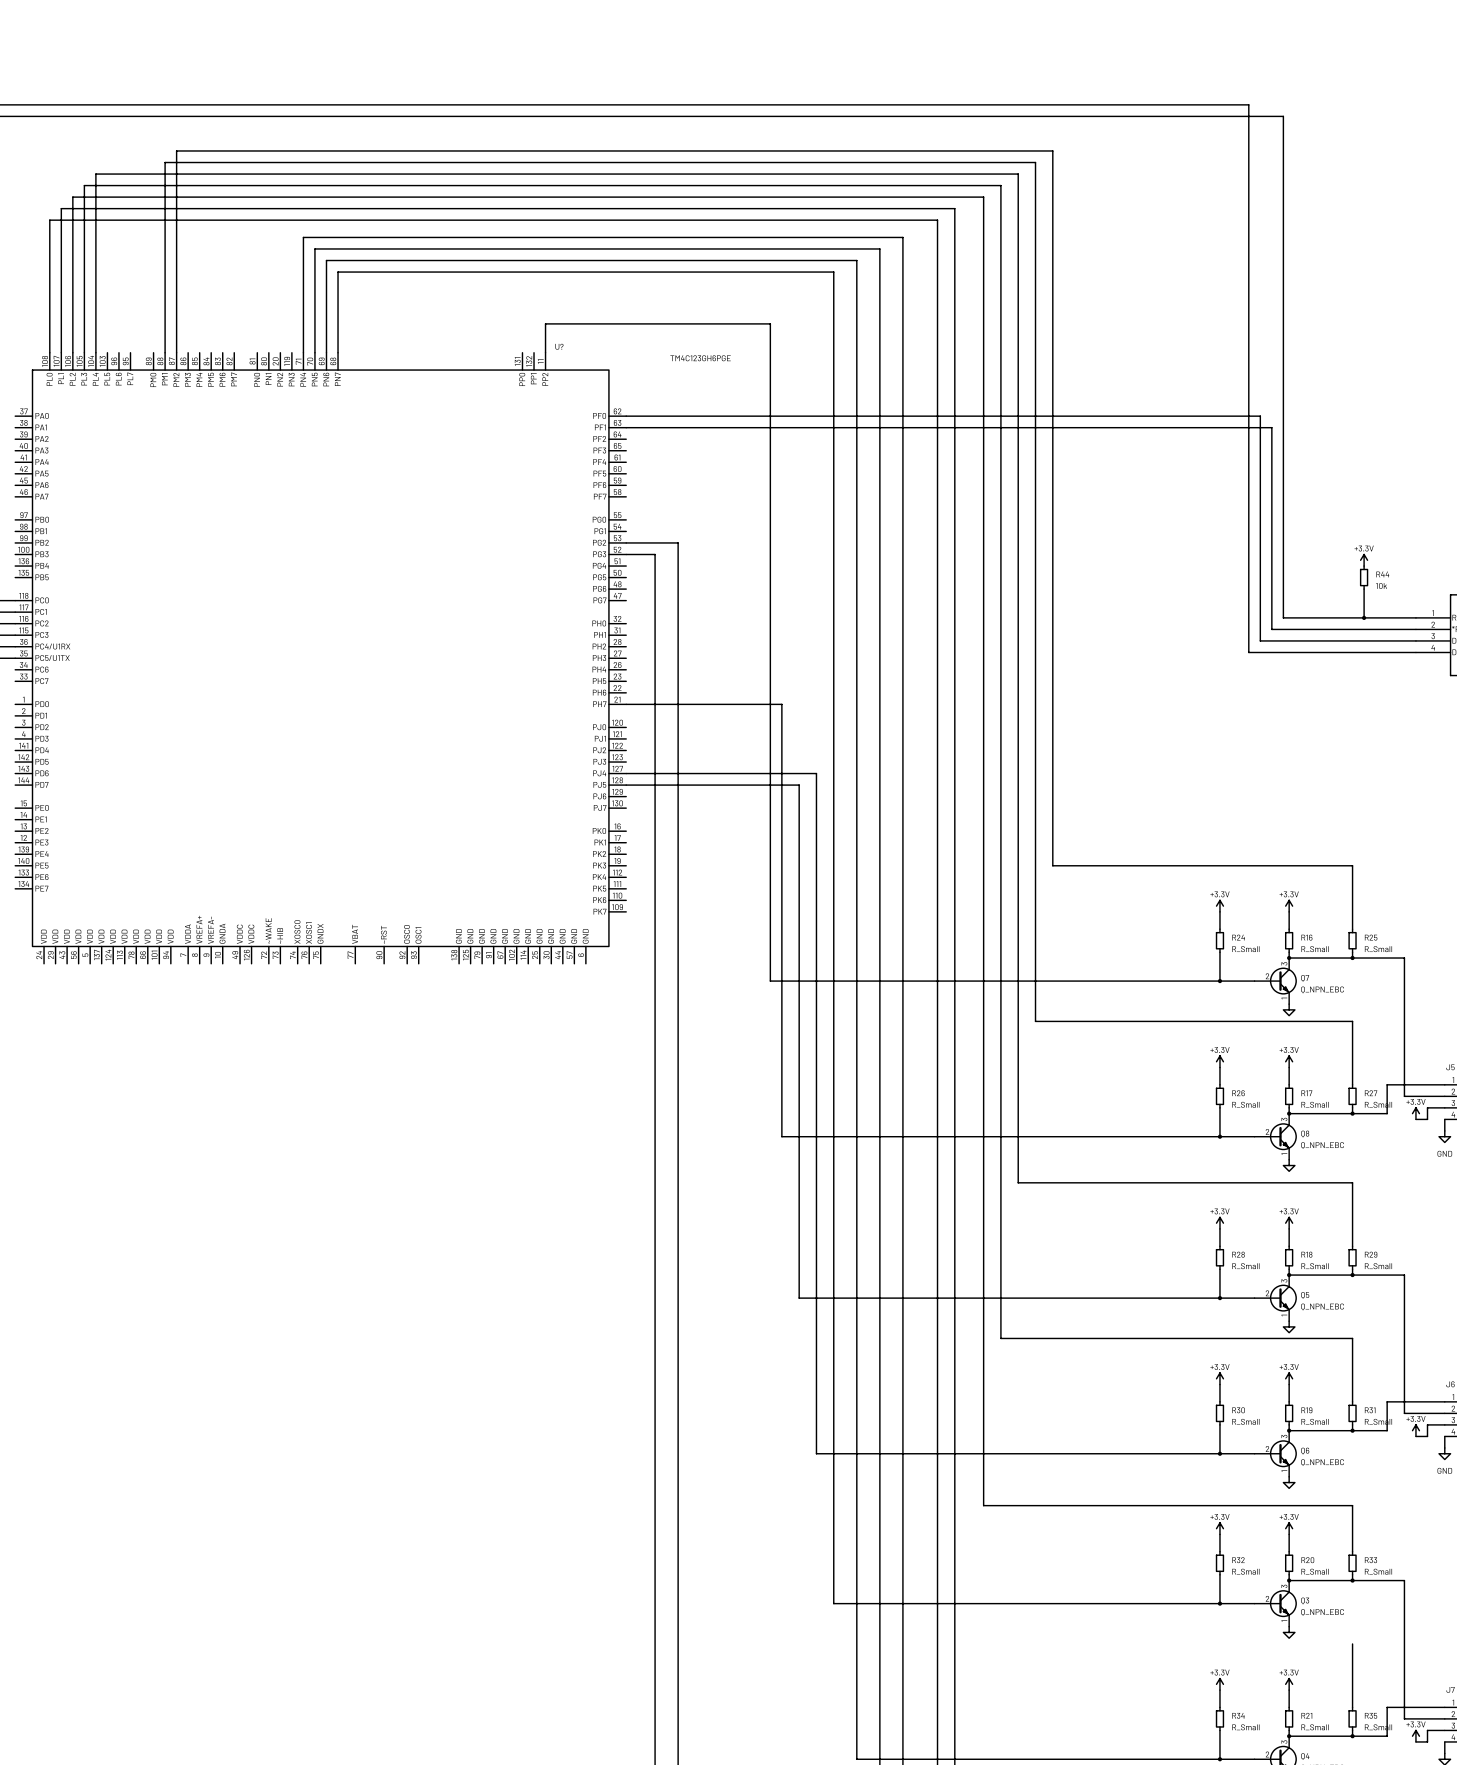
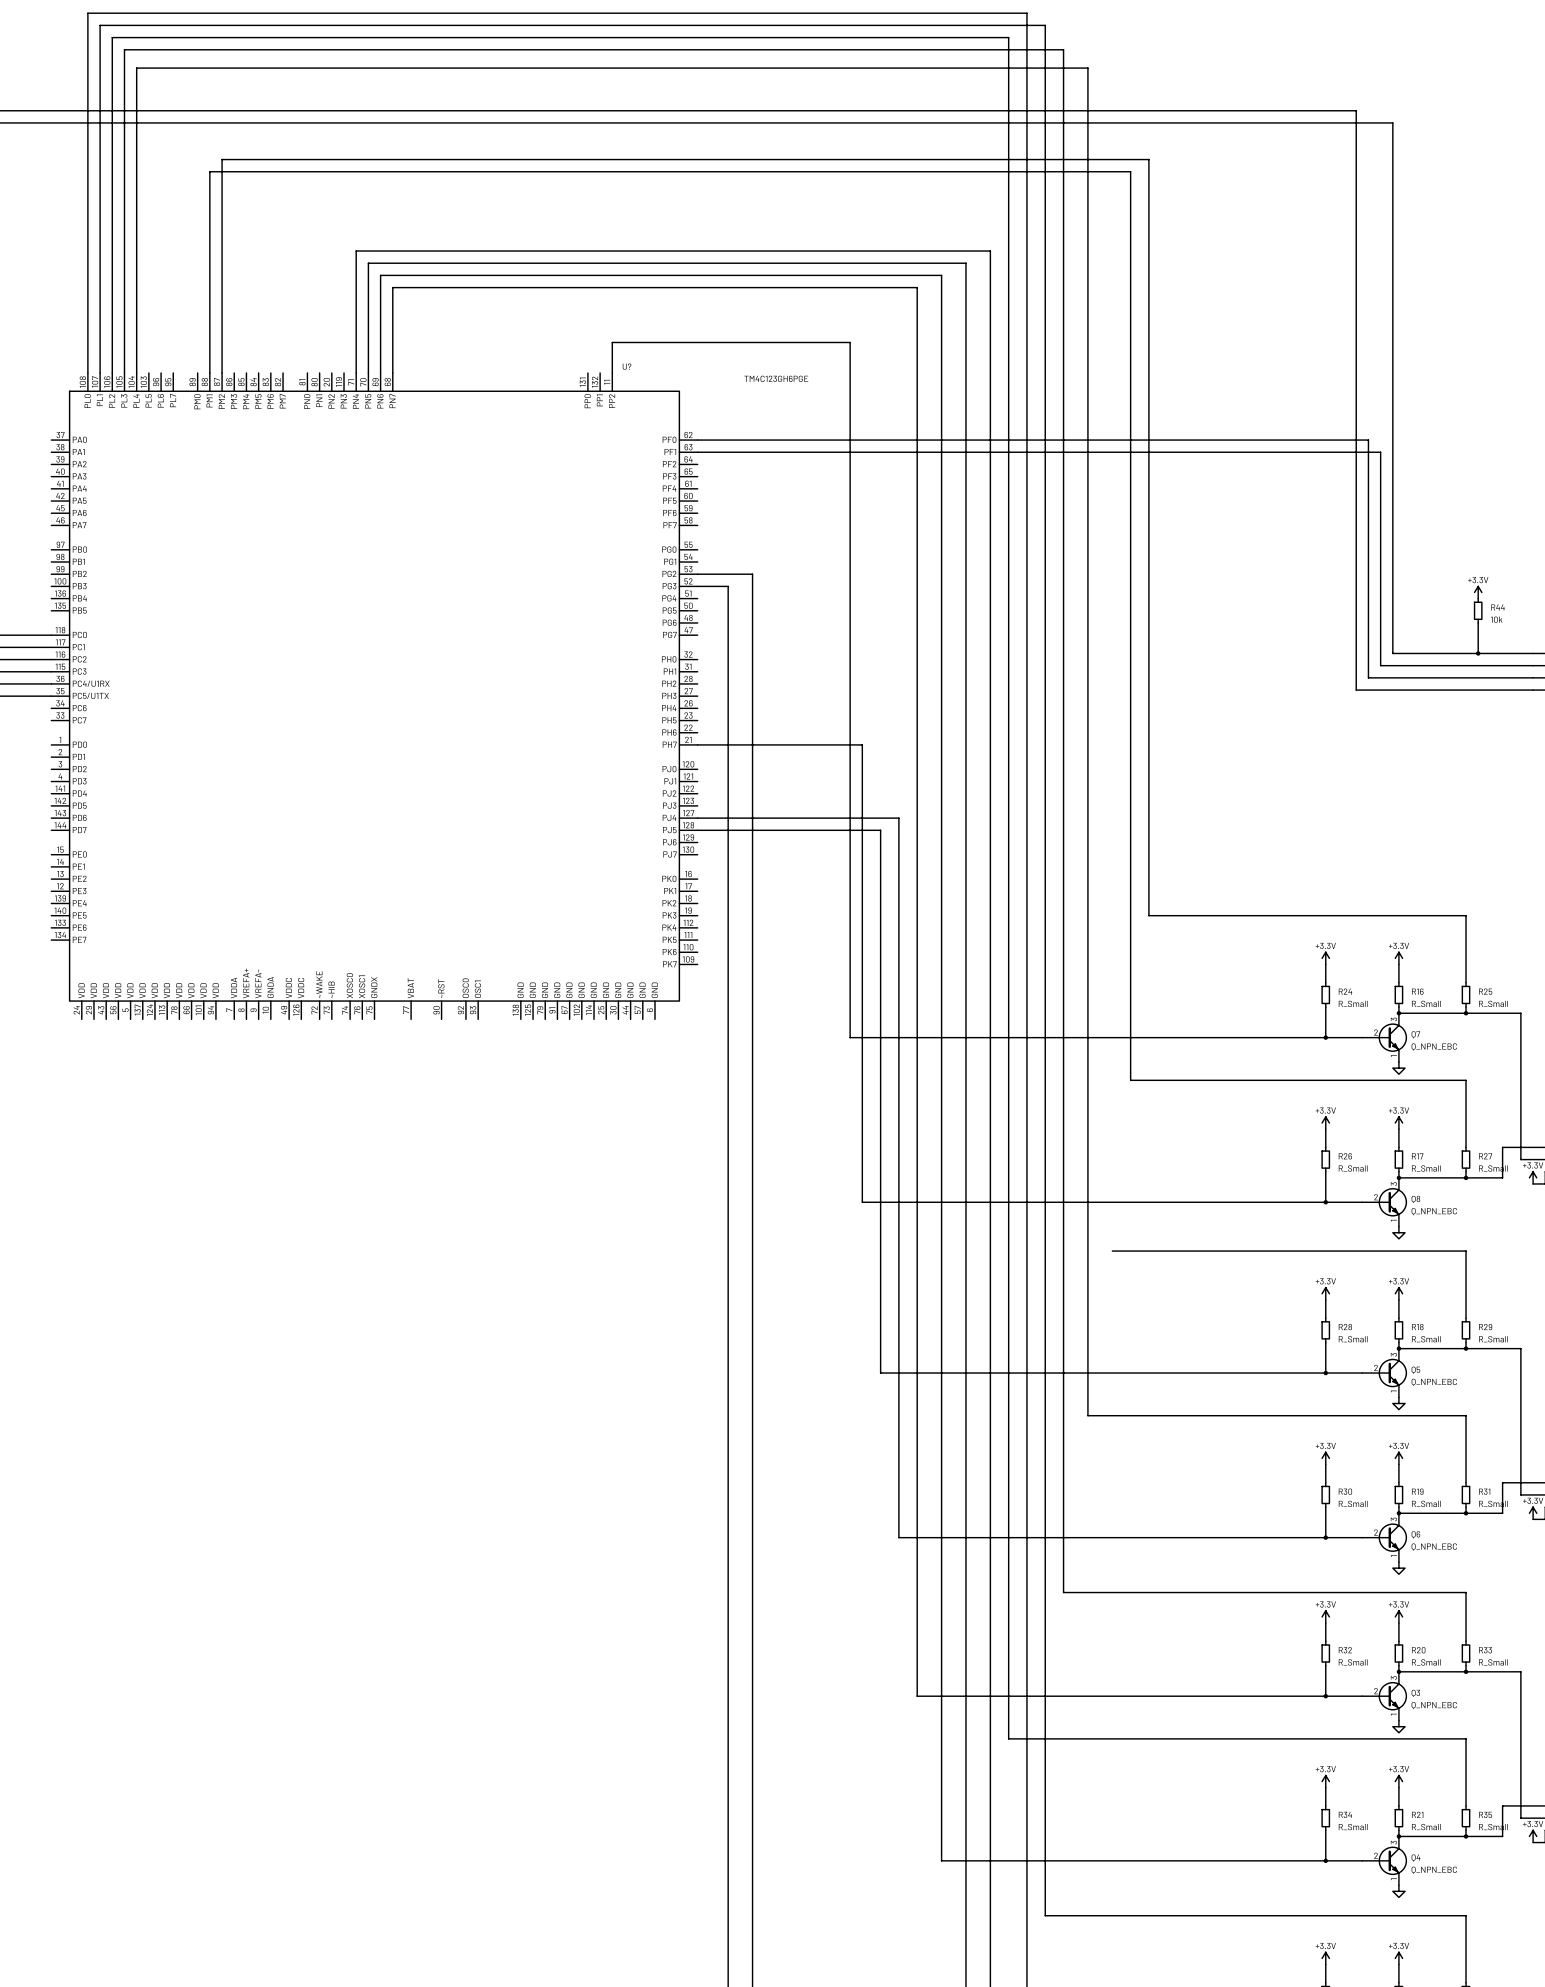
wire: (95, 174) (1018, 174) (1018, 1182) -> none
wire: (84, 185) (1000, 185) (1000, 1338) -> (136, 183) (136, 68) (1087, 68) (1087, 1415) (1094, 1415)
wire: (72, 197) (983, 197) (983, 1505) -> (124, 196) (124, 49) (1063, 49) (1063, 1592) (1075, 1592)
wire: none -> (112, 208) (112, 37) (1008, 37) (1008, 1738) (1466, 1738)
wire: (61, 208) (954, 208) -> (100, 220) (100, 25) (1045, 25) (1045, 220)
wire: (49, 220) (937, 220) -> (87, 232) (87, 13) (1026, 13) (1026, 232)

